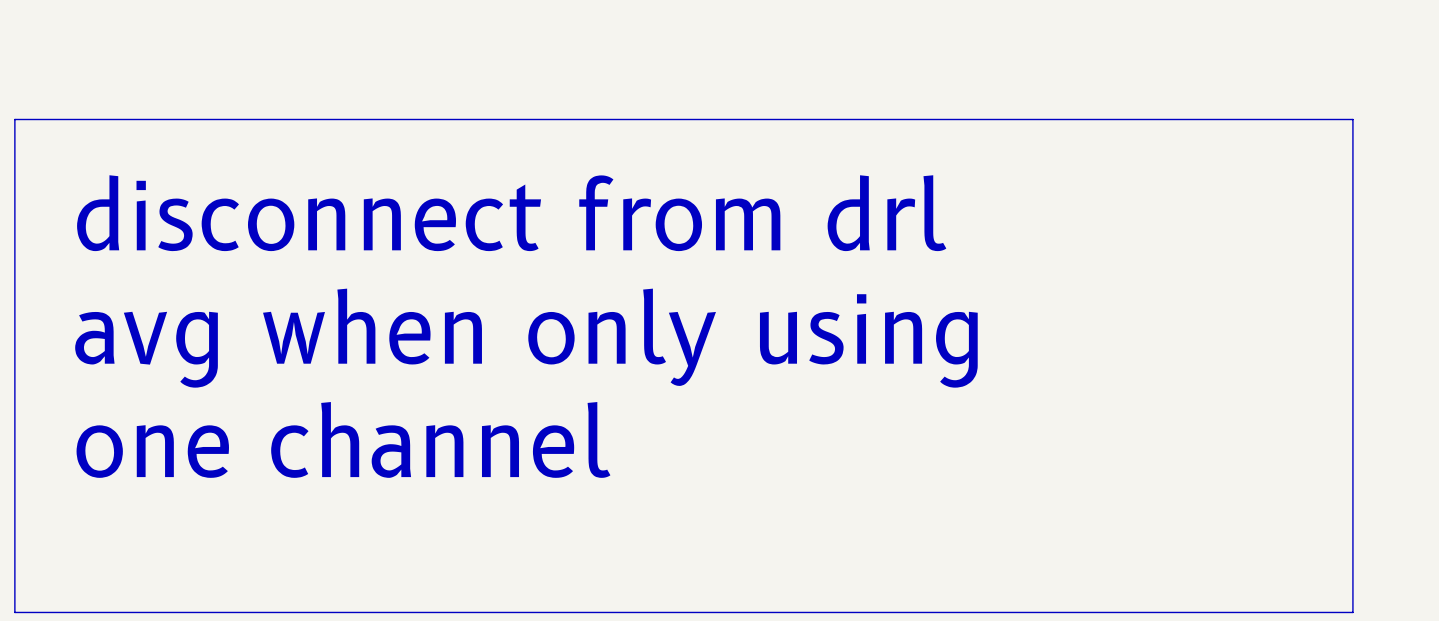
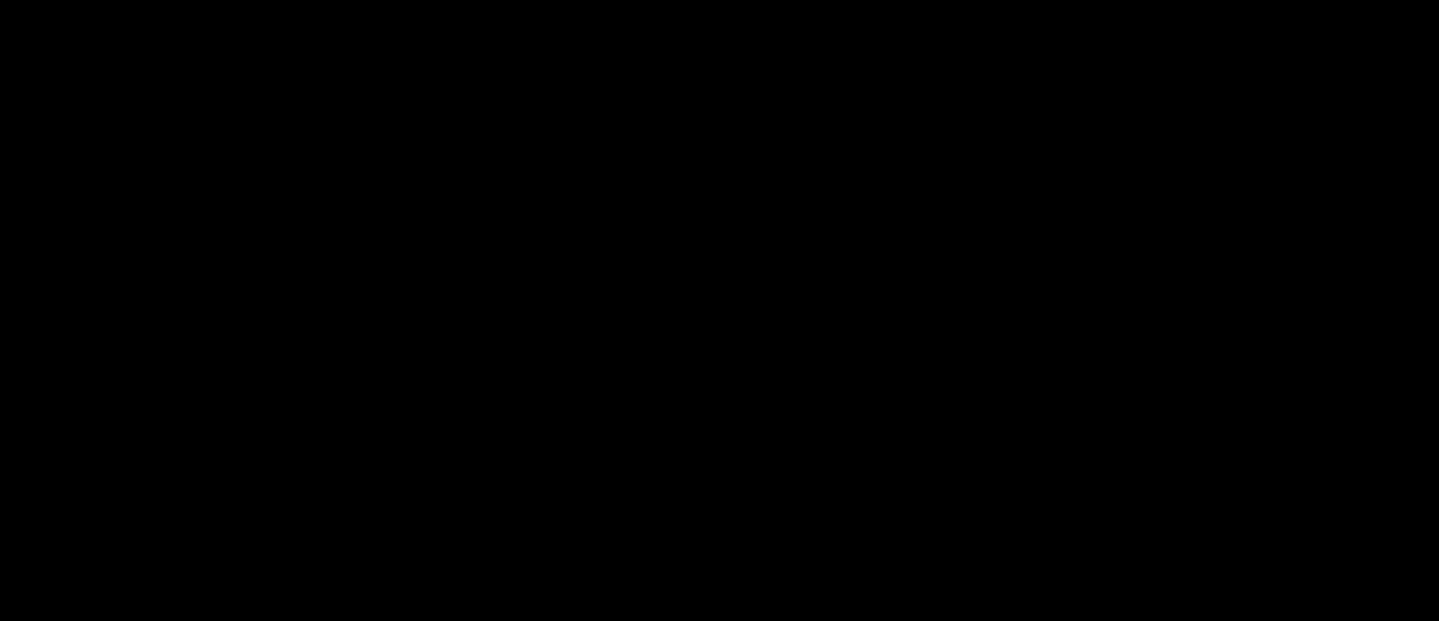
line: (14, 119) (1352, 119) (1352, 612) (14, 612) (14, 119) -> none
text: disconnect from drl (511, 213) -> none
text: avg when only using (526, 338) -> none
text: one channel (343, 439) -> none

